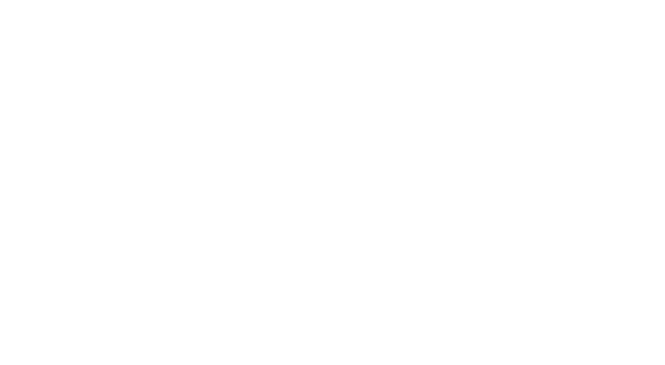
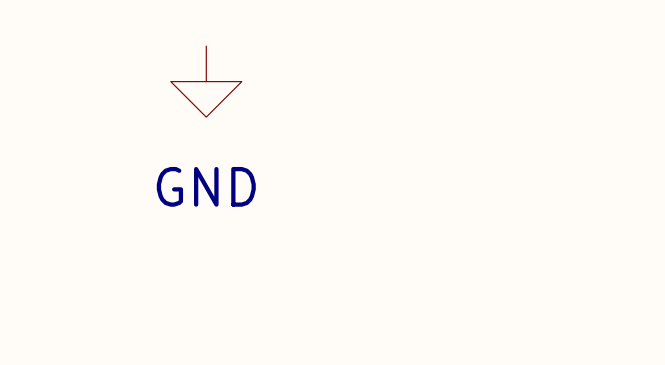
power symbol: none -> GND (206, 81)

